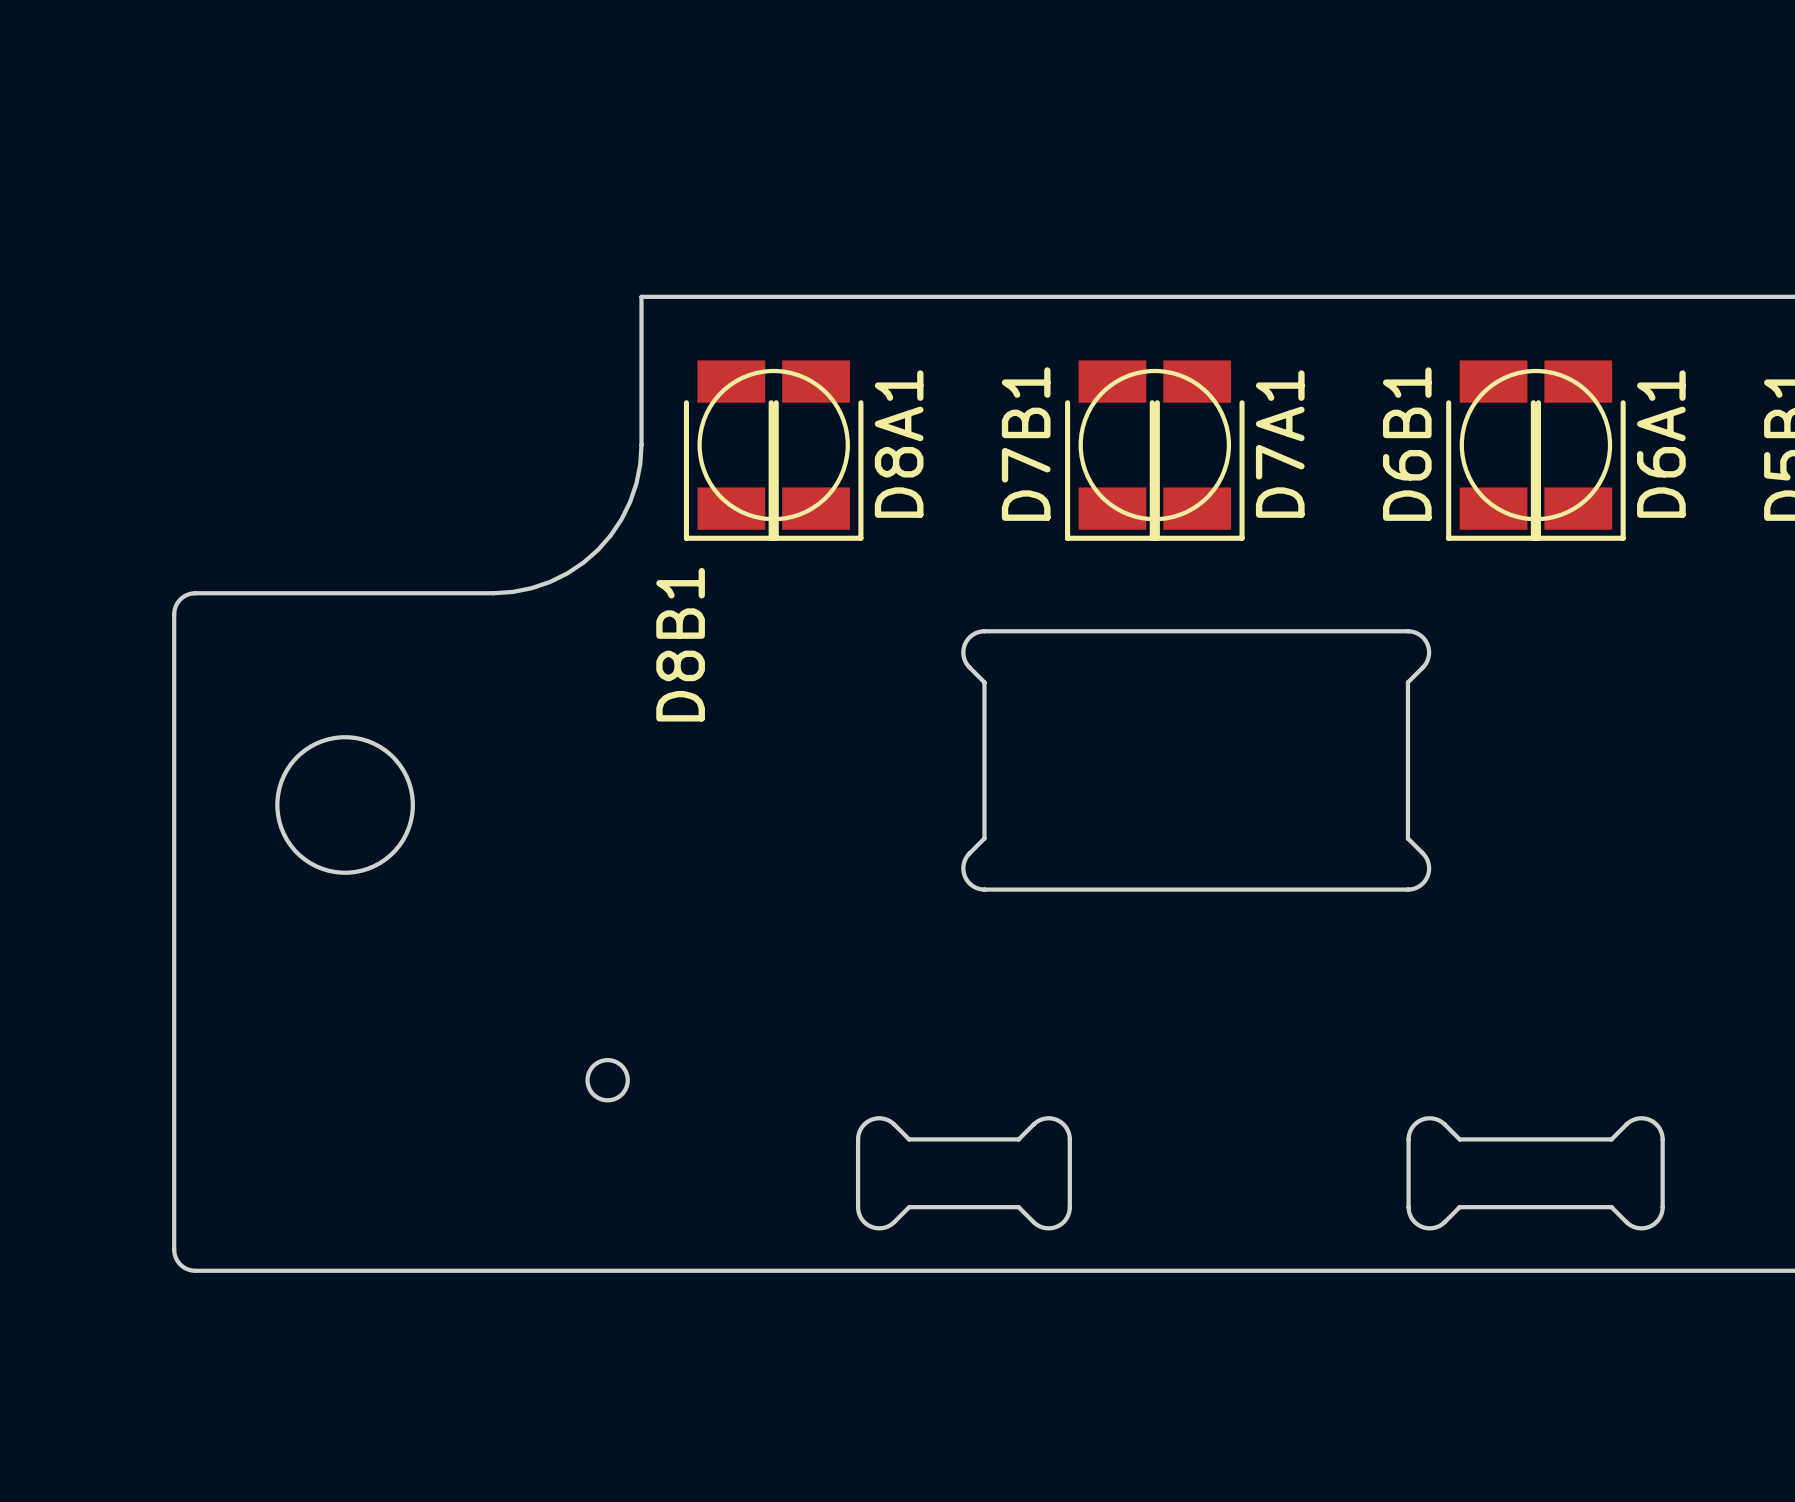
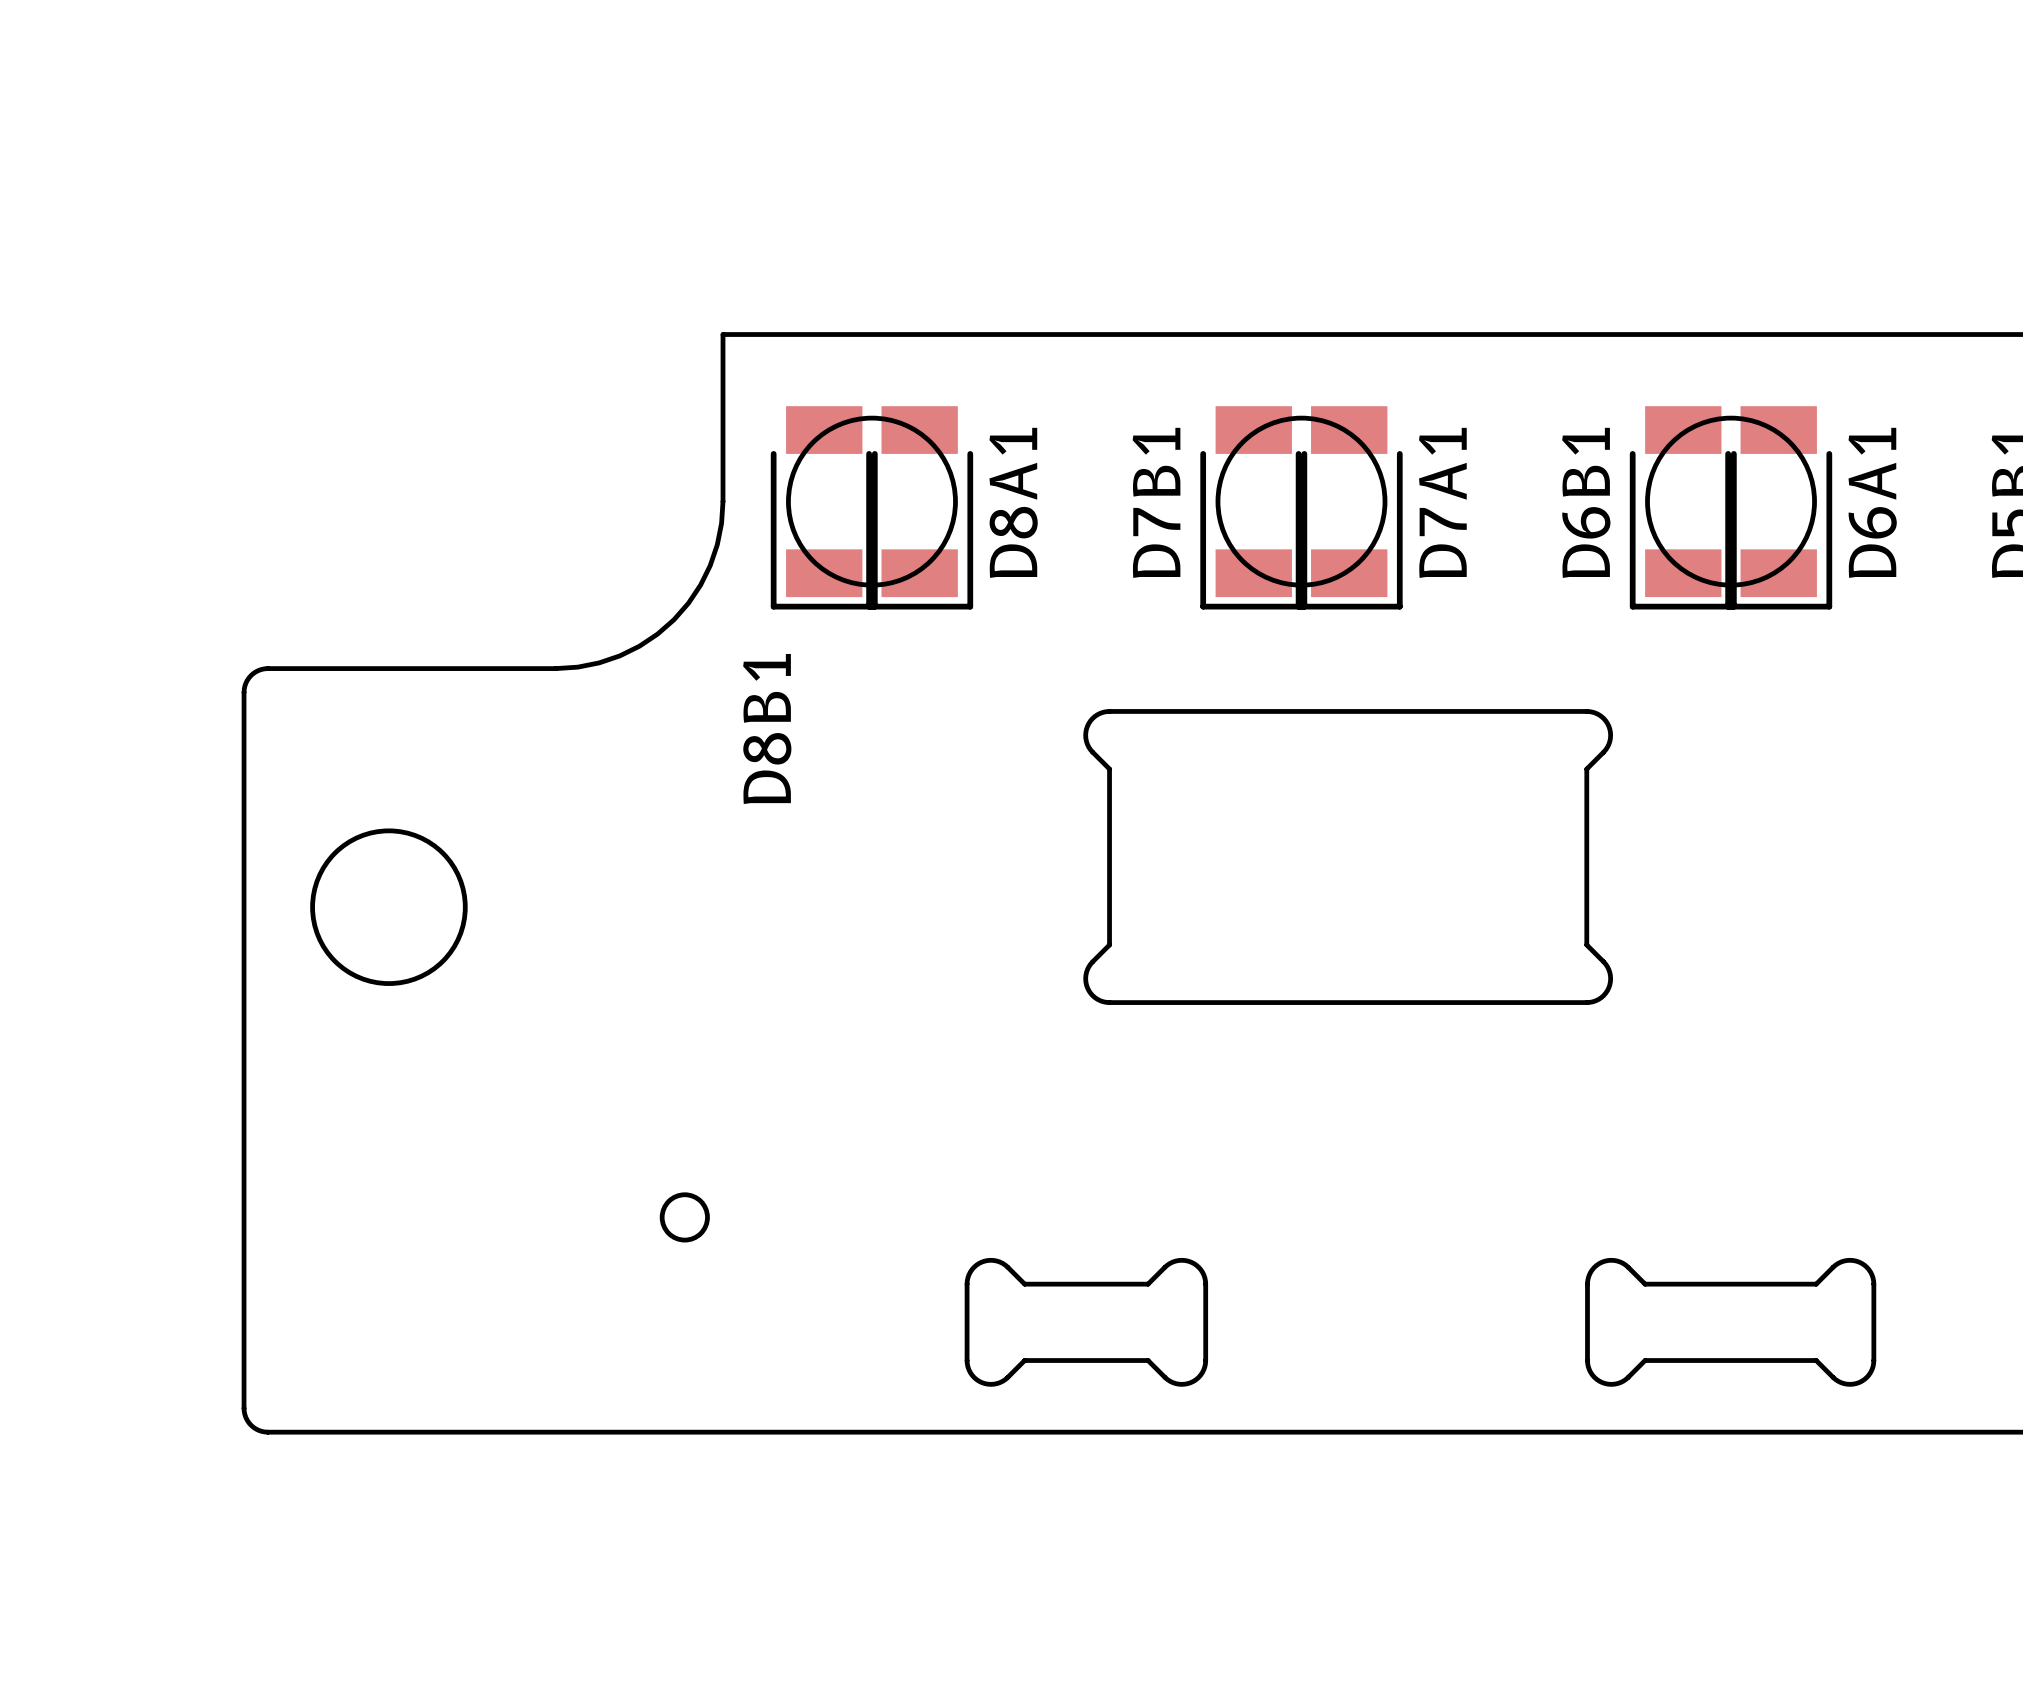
board edge: (237, 593) (189, 593) (178, 601) (174, 614) (174, 1252) (178, 1262) (189, 1270) (237, 1270) -> (267, 668) (258, 670) (251, 675) (245, 683) (244, 692) (244, 1408) (245, 1417) (251, 1425) (258, 1430) (267, 1432)

